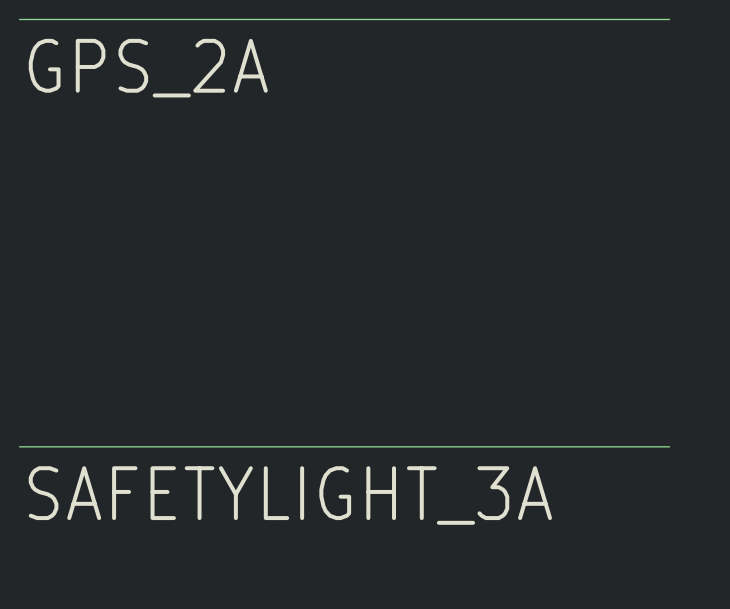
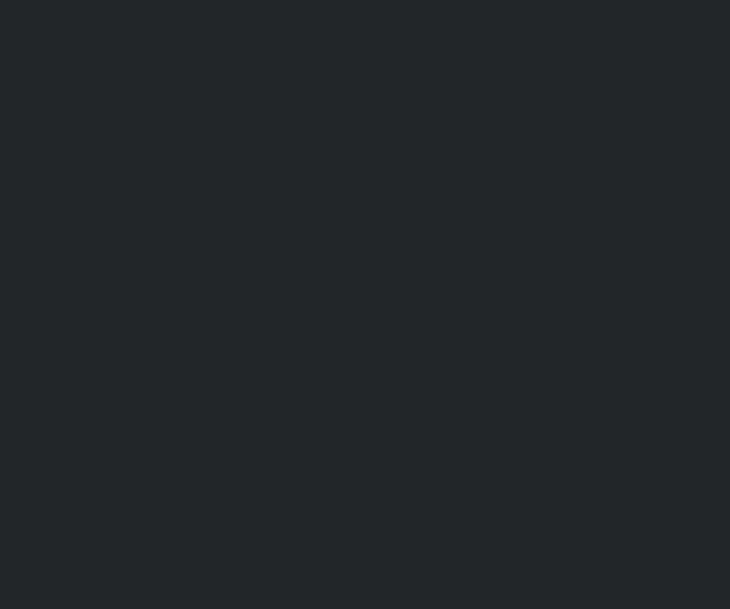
wire: (19, 19) (669, 19) -> none
label: GPS_2A (148, 68) -> none
wire: (19, 446) (669, 446) -> none
label: SAFETYLIGHT_3A (290, 495) -> none

